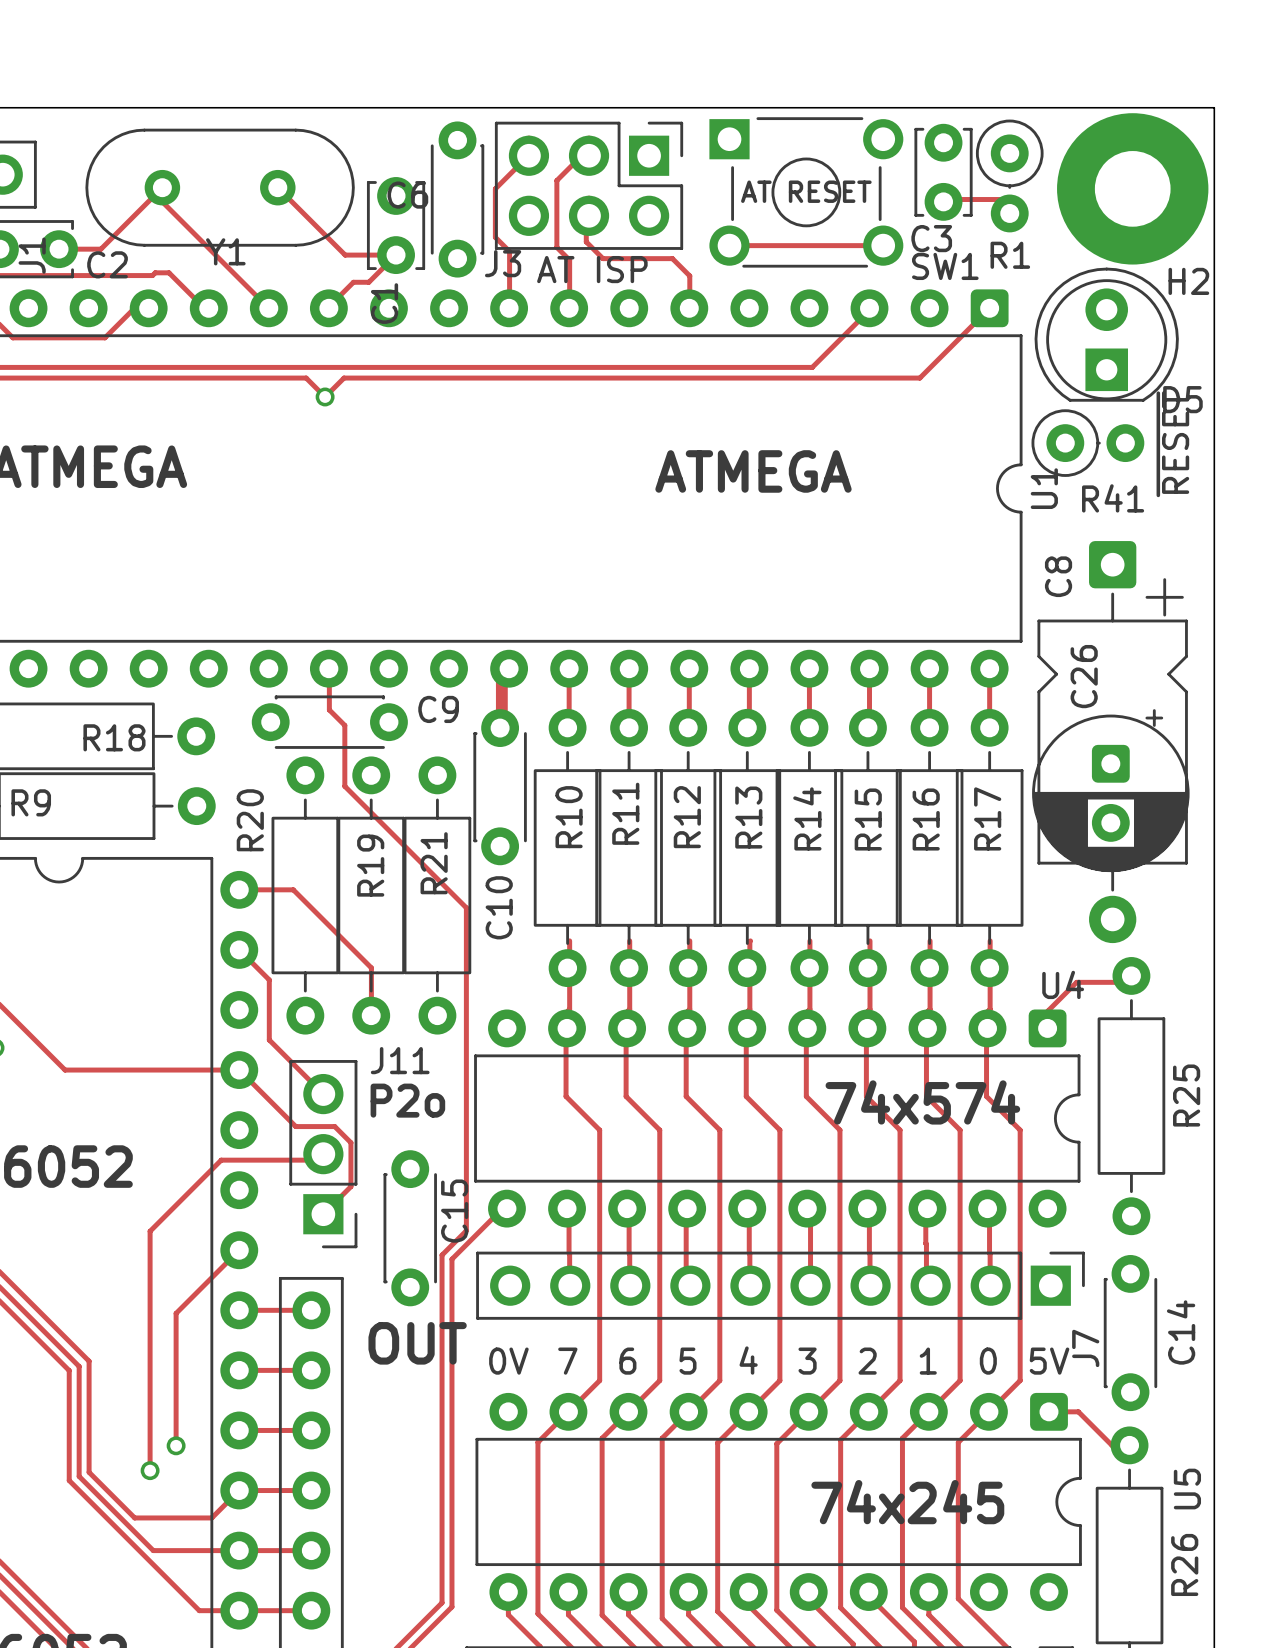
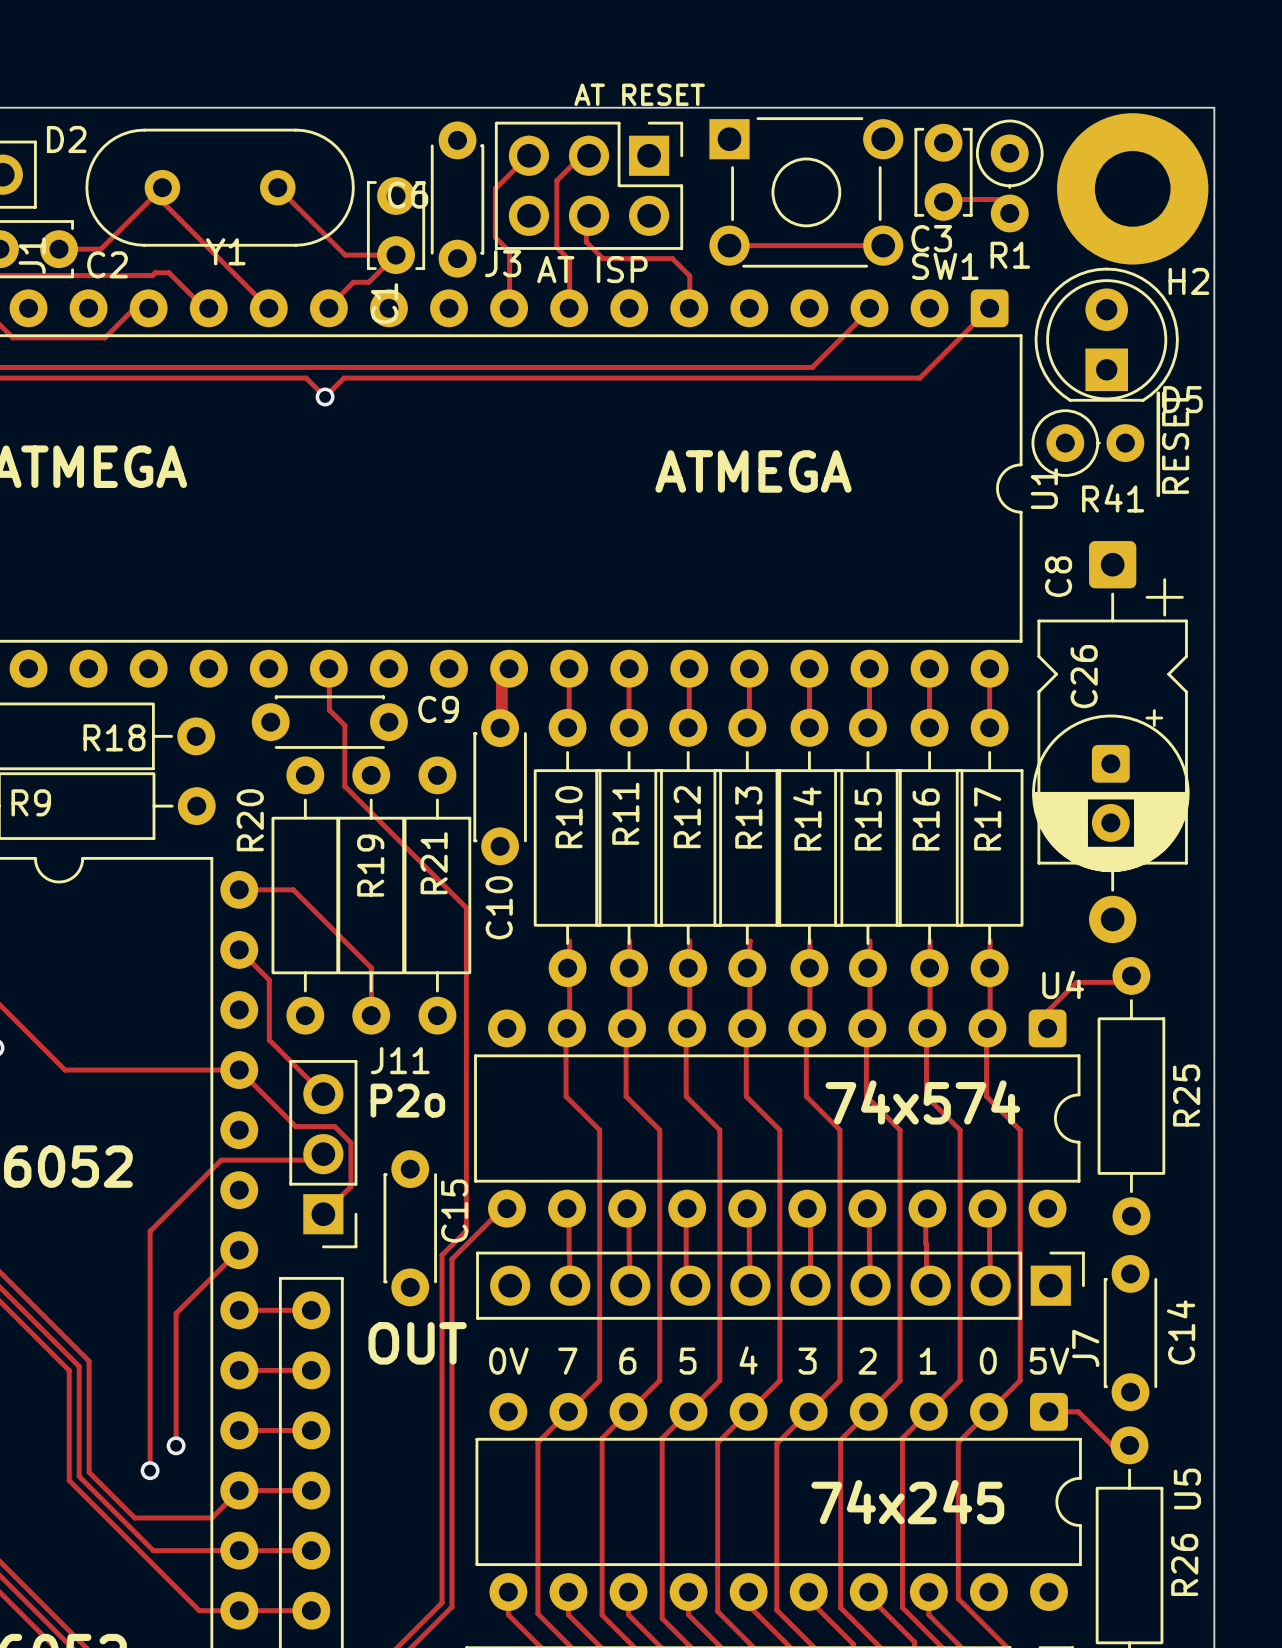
text: none -> D2 (66, 139)
text position: AT RESET (806, 191) -> AT RESET (639, 94)

